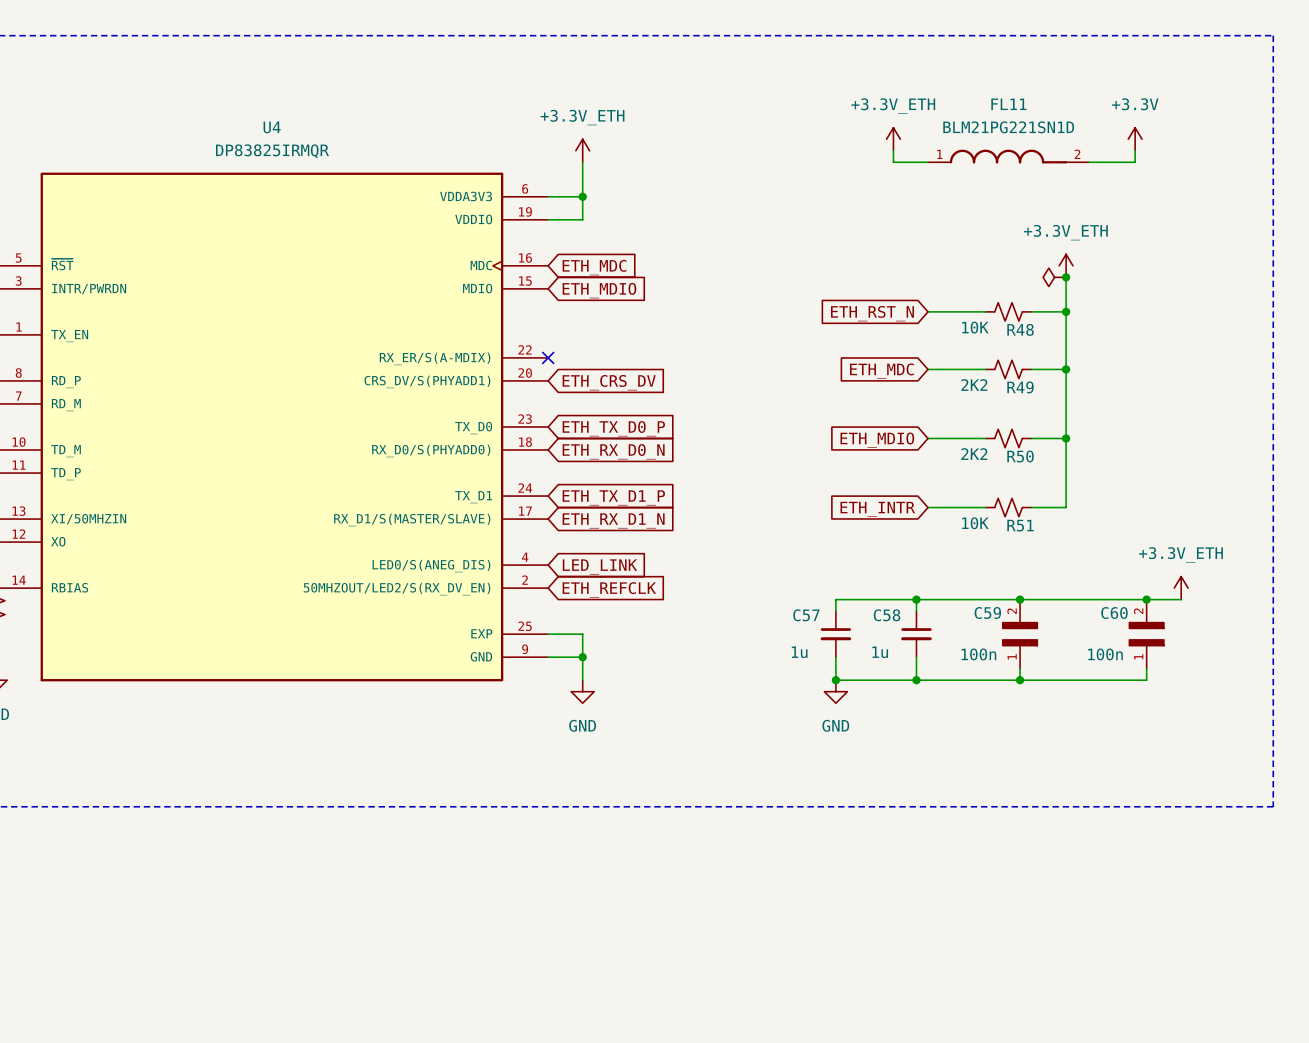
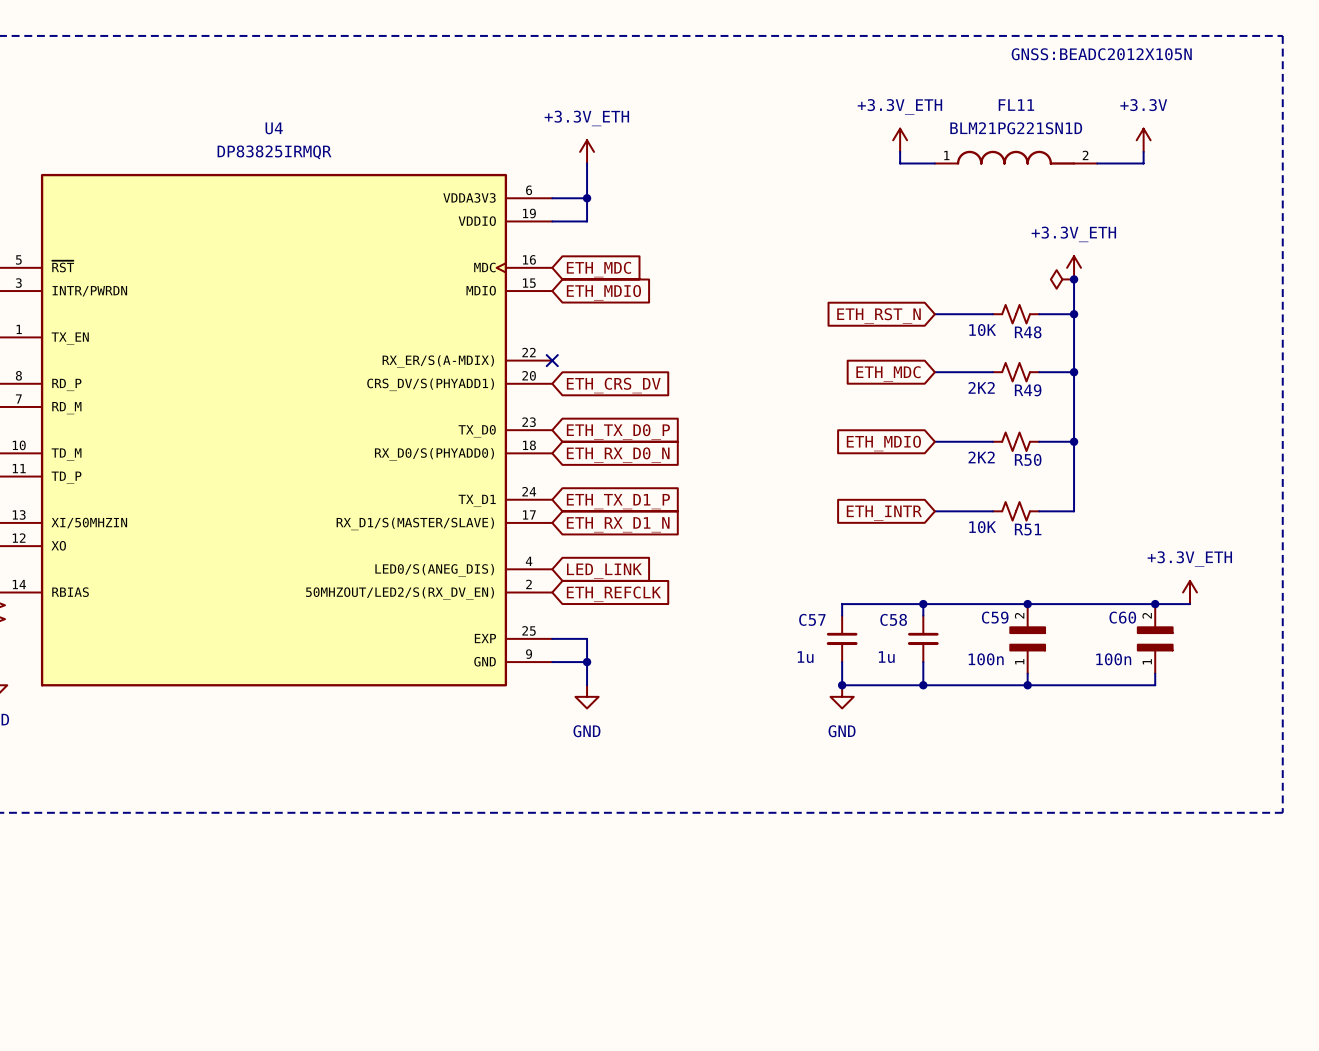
FL11 text: none -> GNSS:BEADC2012X105N (1101, 54)

